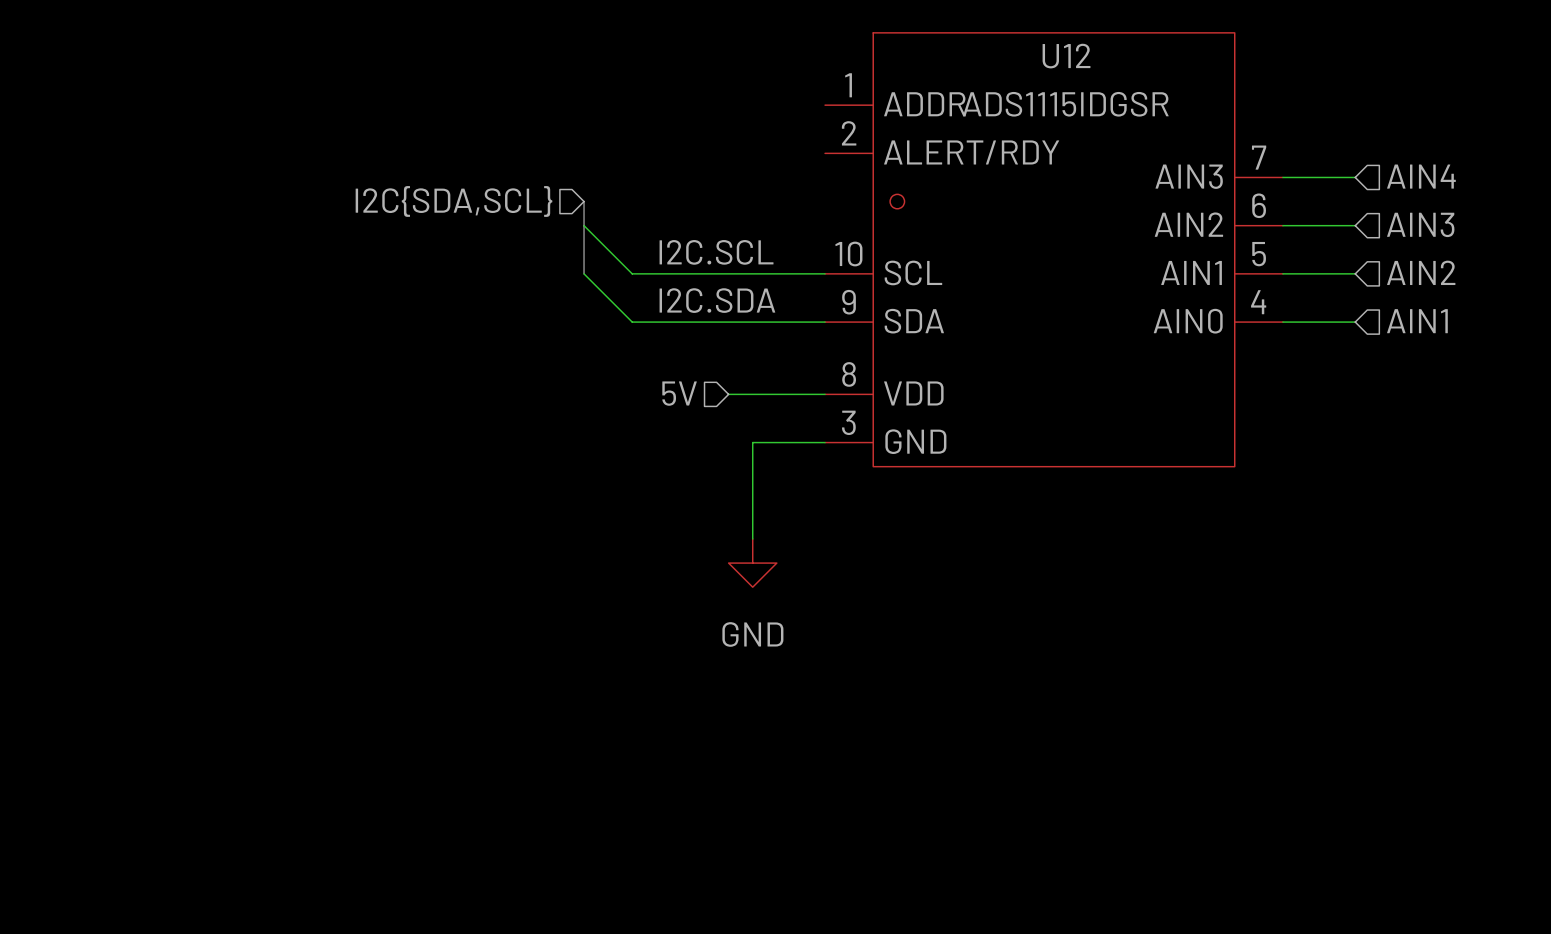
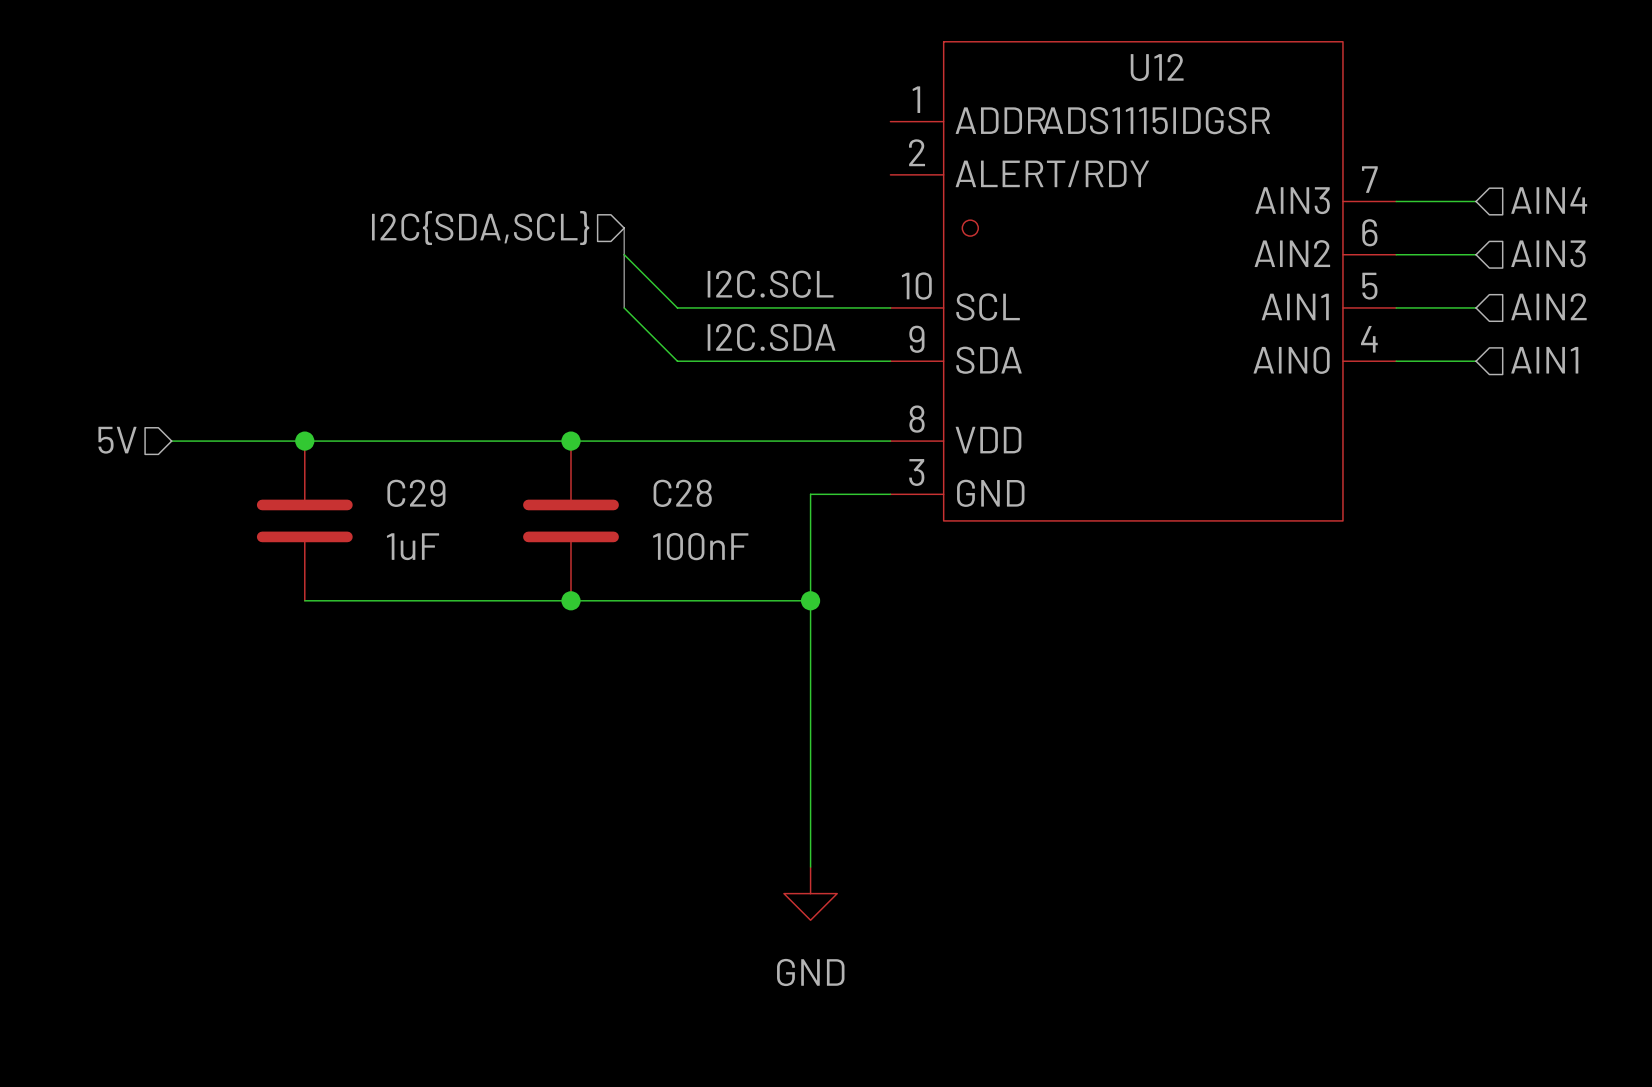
hierarchical label: none -> 5V (117, 440)
hierarchical label: 5V (679, 393) -> none
wire: none -> (171, 441) (783, 441)
junction: none -> (304, 441)
junction: none -> (570, 441)
C29: none -> 1uF (304, 520)
C28: none -> 100nF (570, 520)
wire: none -> (304, 600) (810, 600) (810, 867)
junction: none -> (570, 600)
junction: none -> (810, 600)
power symbol position: GND (752, 563) -> GND (810, 893)

